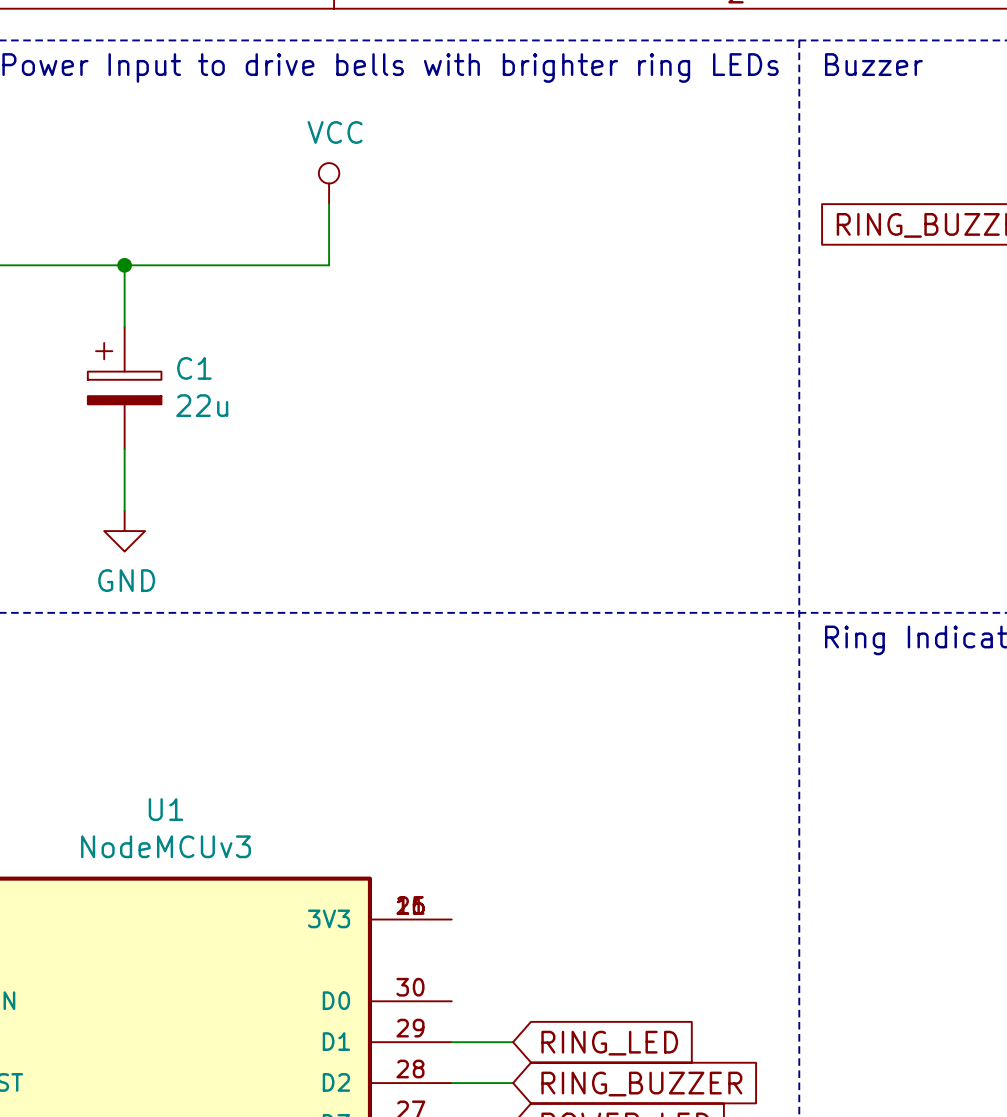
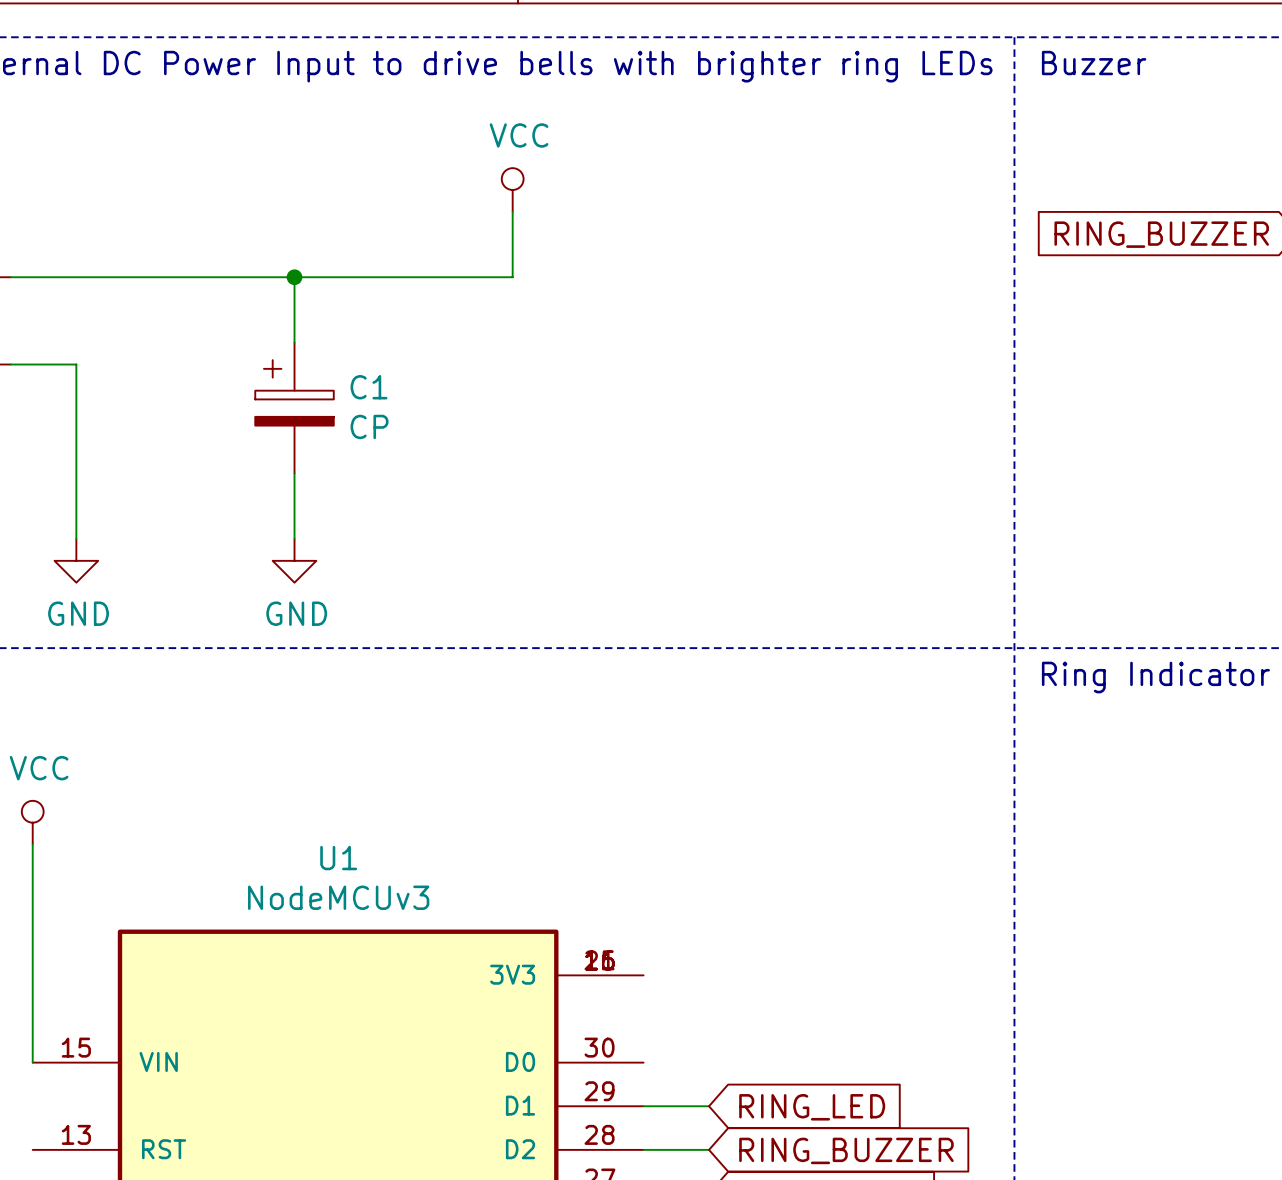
C1 value: 22u (202, 405) -> CP (369, 426)

